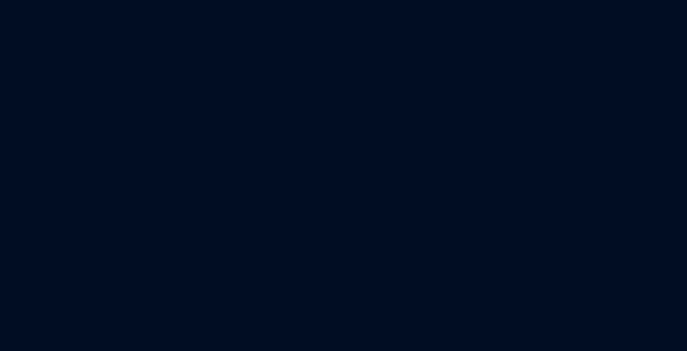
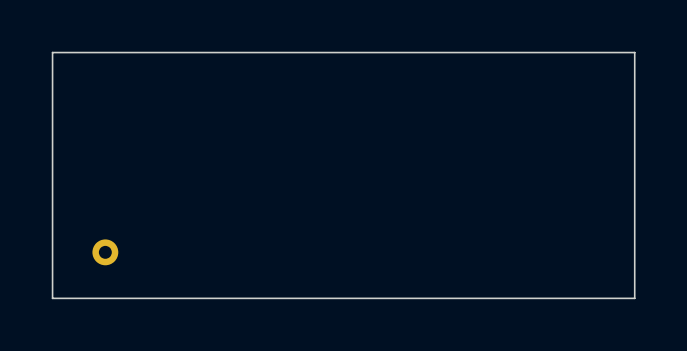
board edge: none -> (634, 52) (634, 298) (52, 298) (52, 52) (634, 52)
part: none -> (105, 252)

